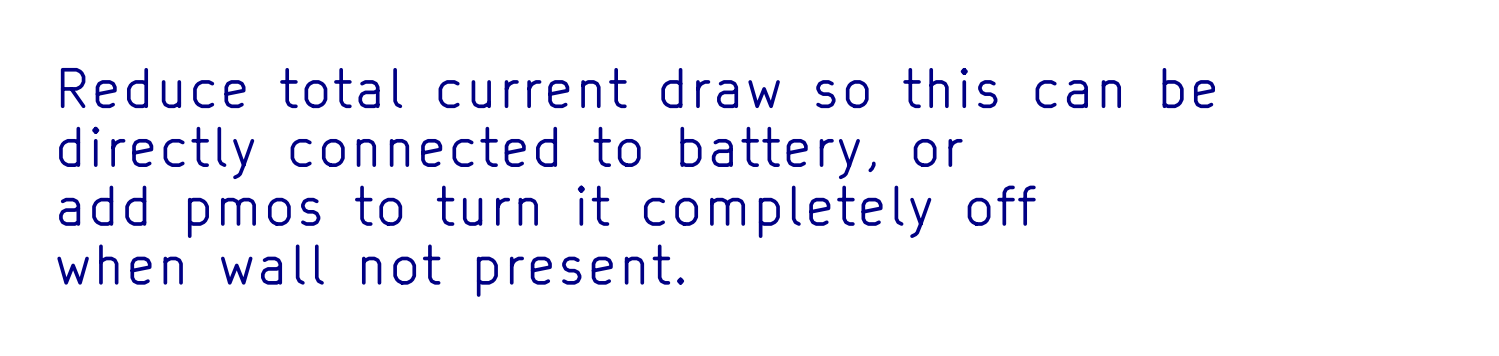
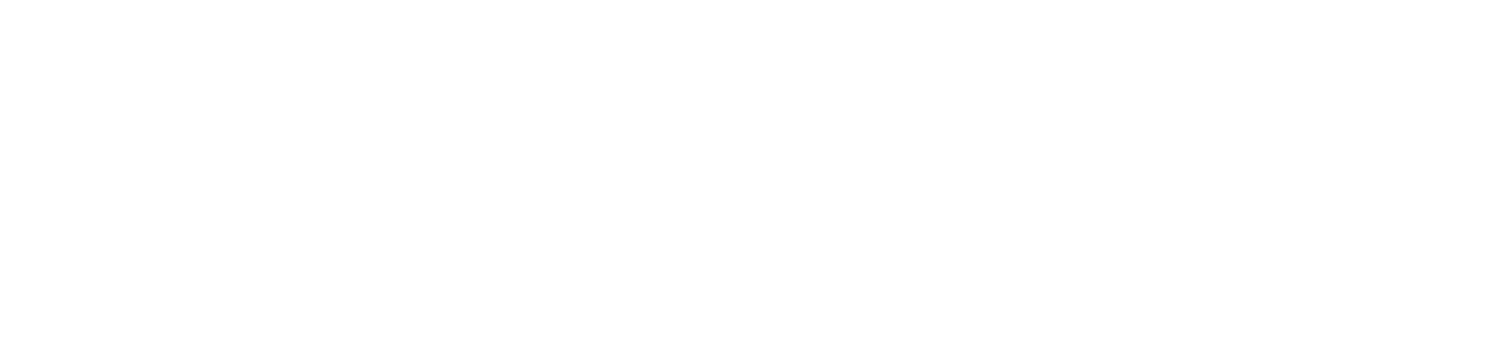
text: Reduce total current draw so this can be (637, 88) -> none
text: directly connected to battery, or (510, 152) -> none
text: add pmos to turn it completely off (547, 211) -> none
text: when wall not present. (370, 270) -> none

